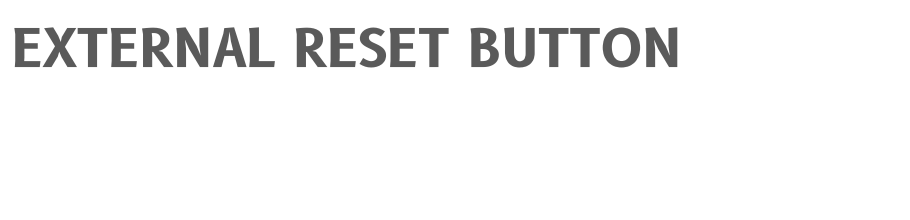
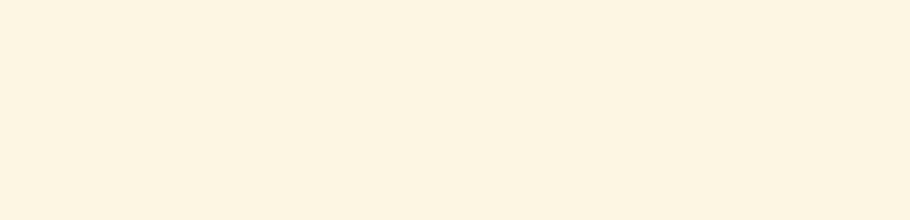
text: EXTERNAL RESET BUTTON (345, 47) -> none

